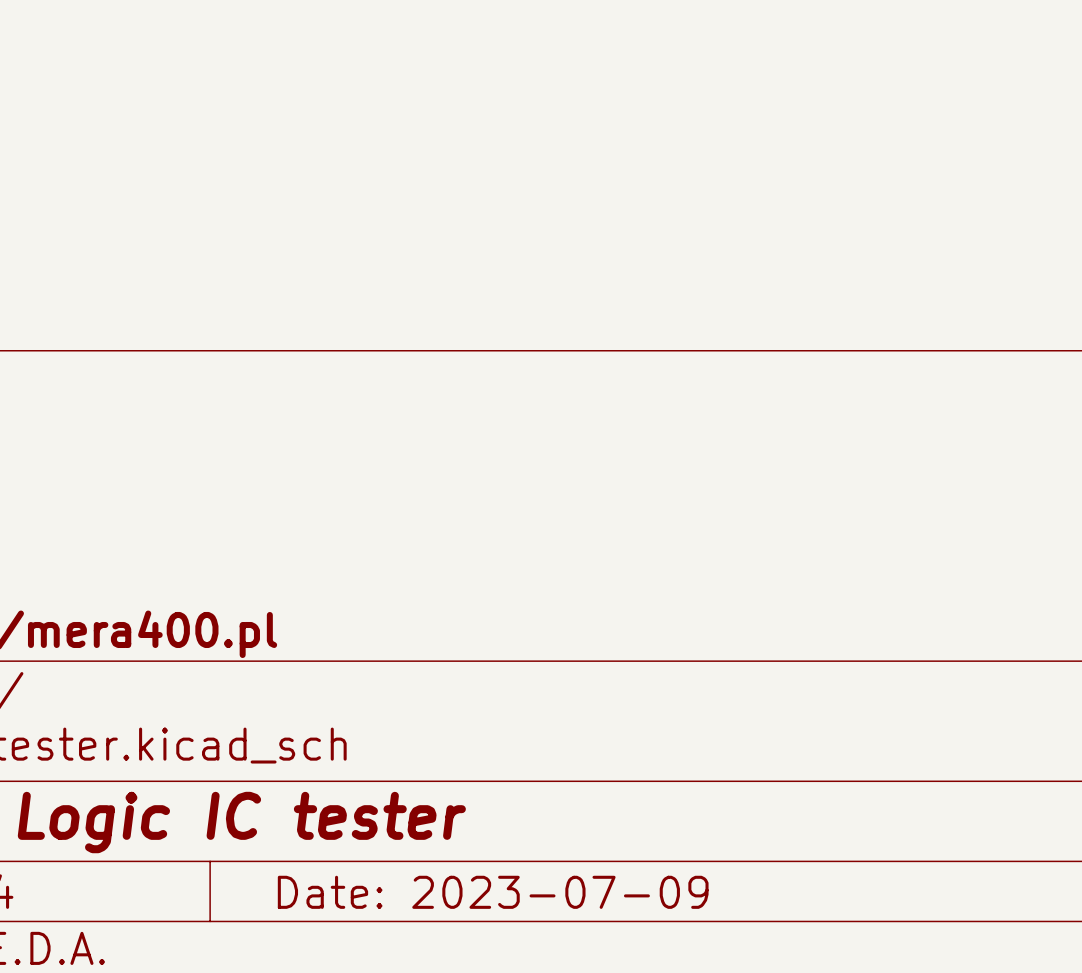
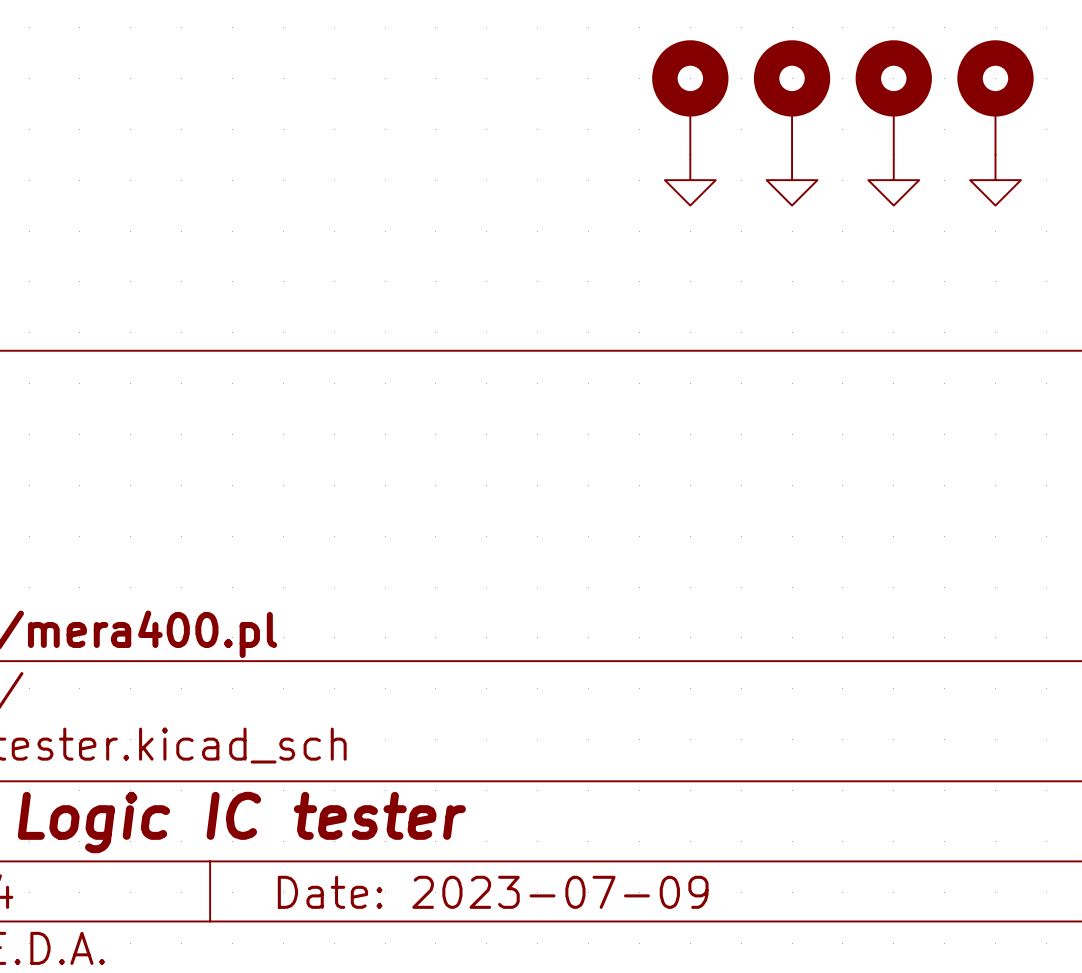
part: none -> (690, 97)
part: none -> (792, 97)
part: none -> (893, 97)
part: none -> (995, 97)
power symbol: none -> (690, 180)
power symbol: none -> (792, 180)
power symbol: none -> (893, 180)
power symbol: none -> (995, 180)

